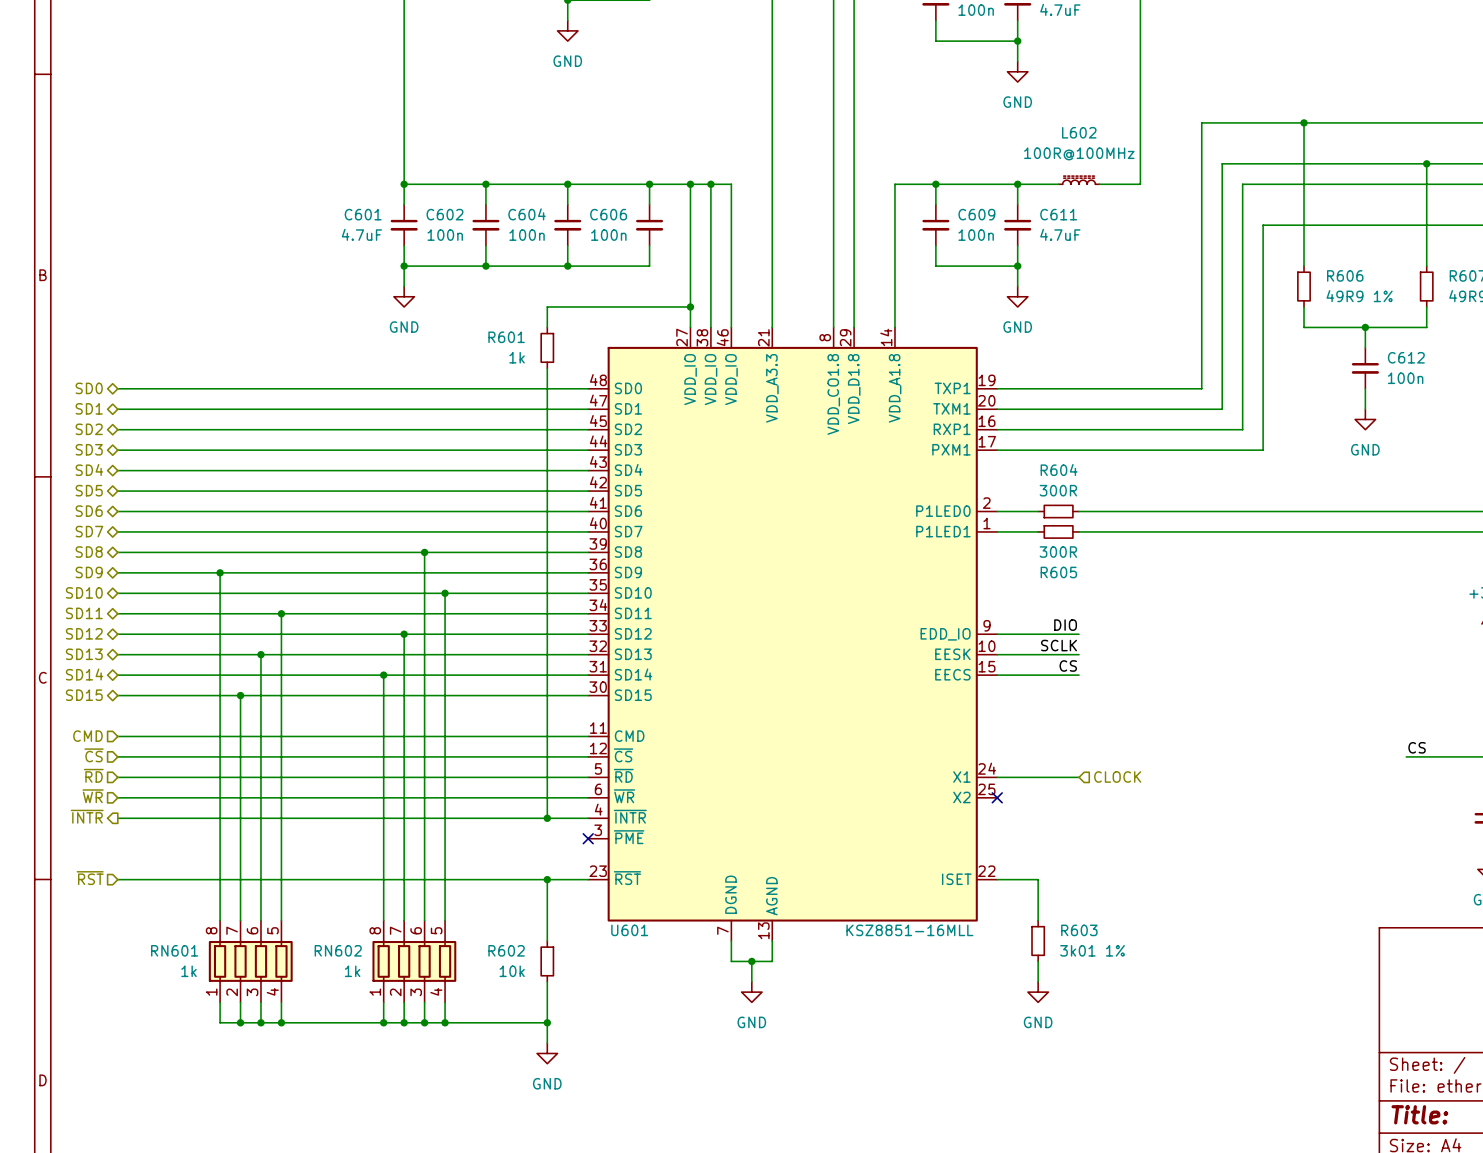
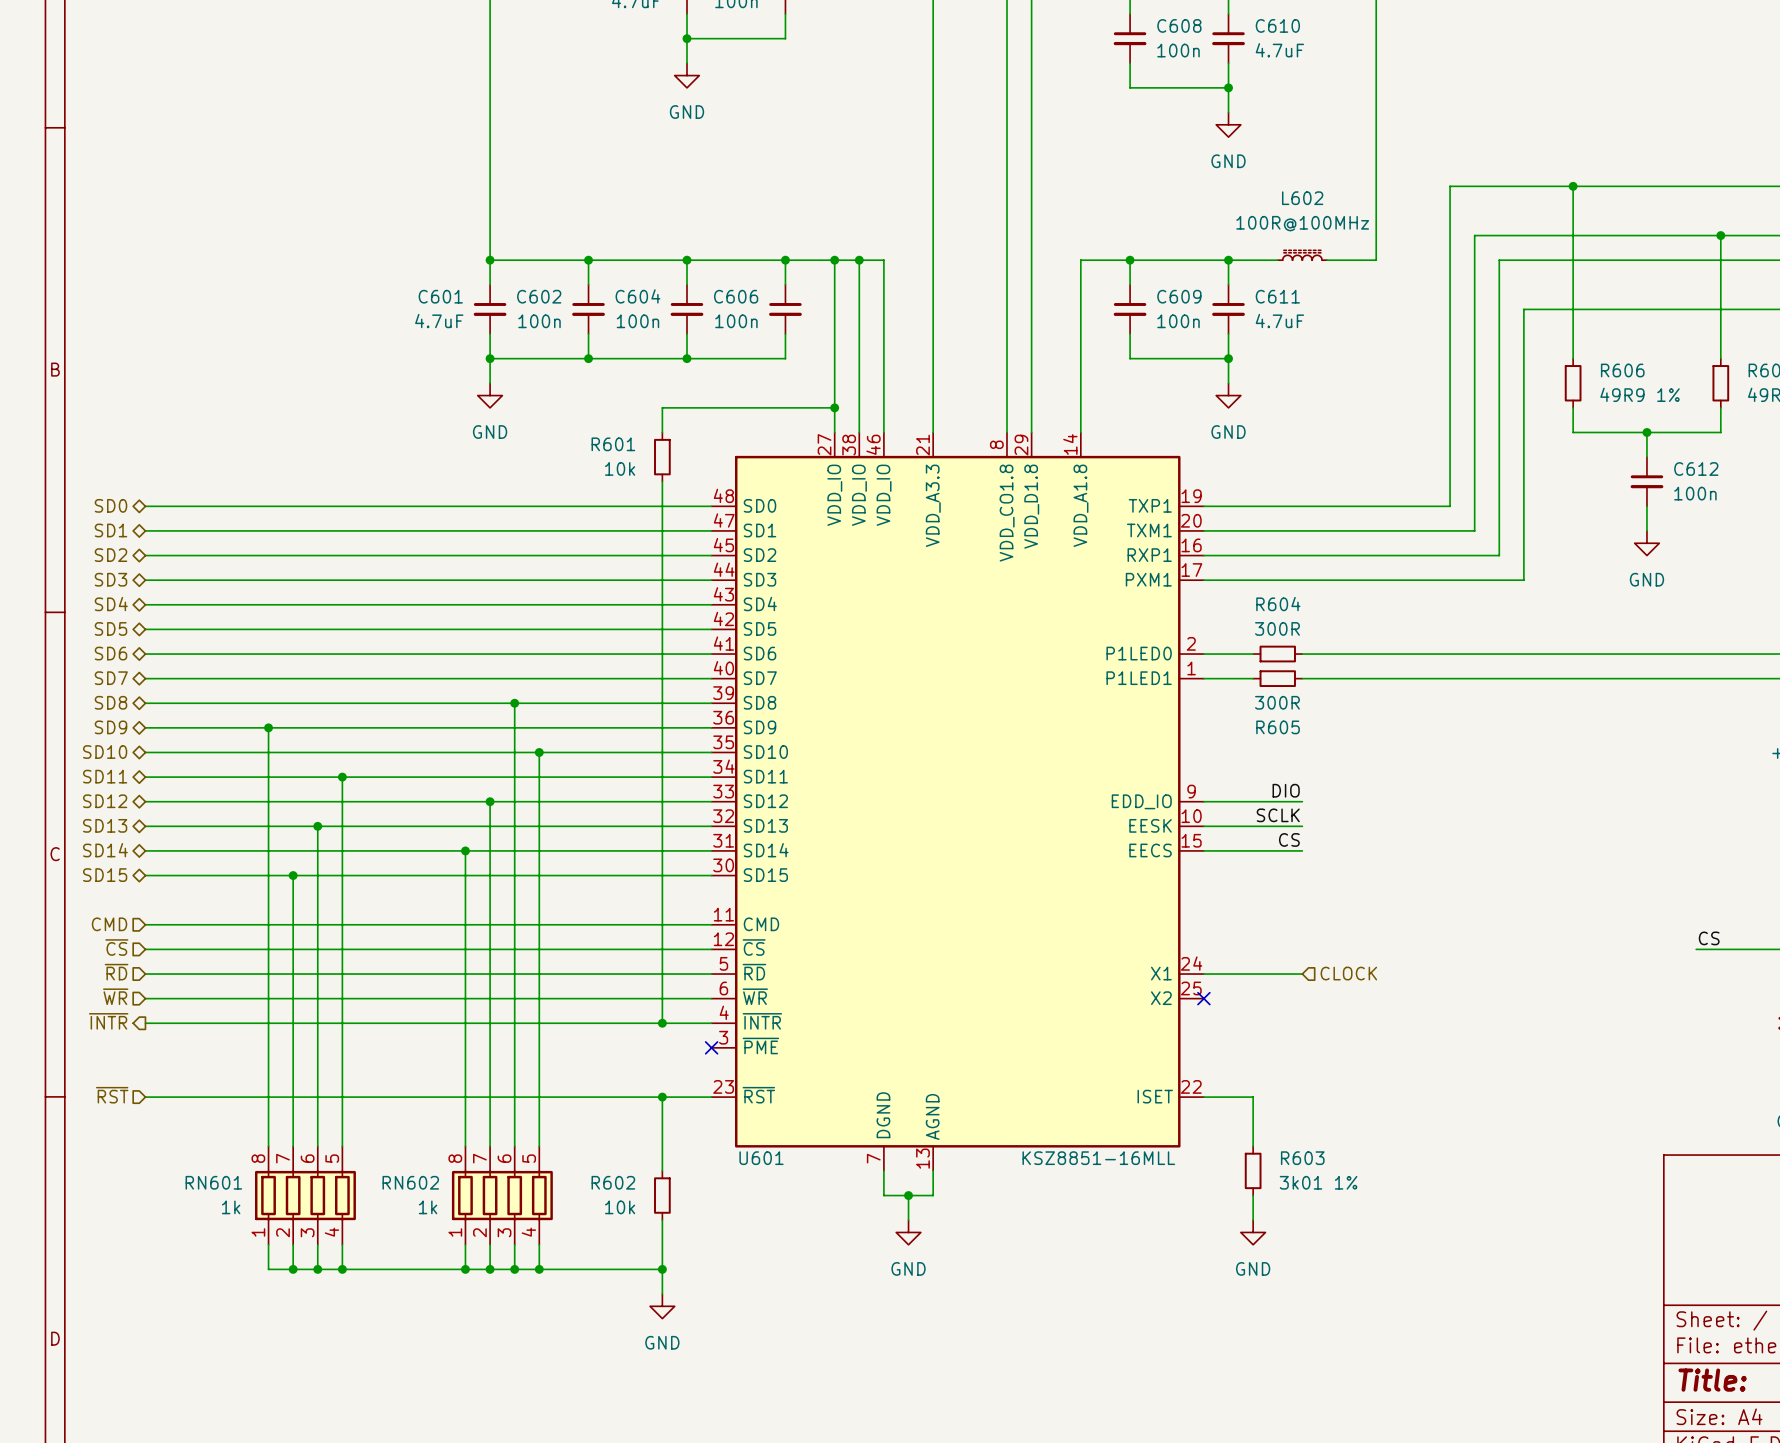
R601 value: 1k (517, 357) -> 10k (620, 468)

